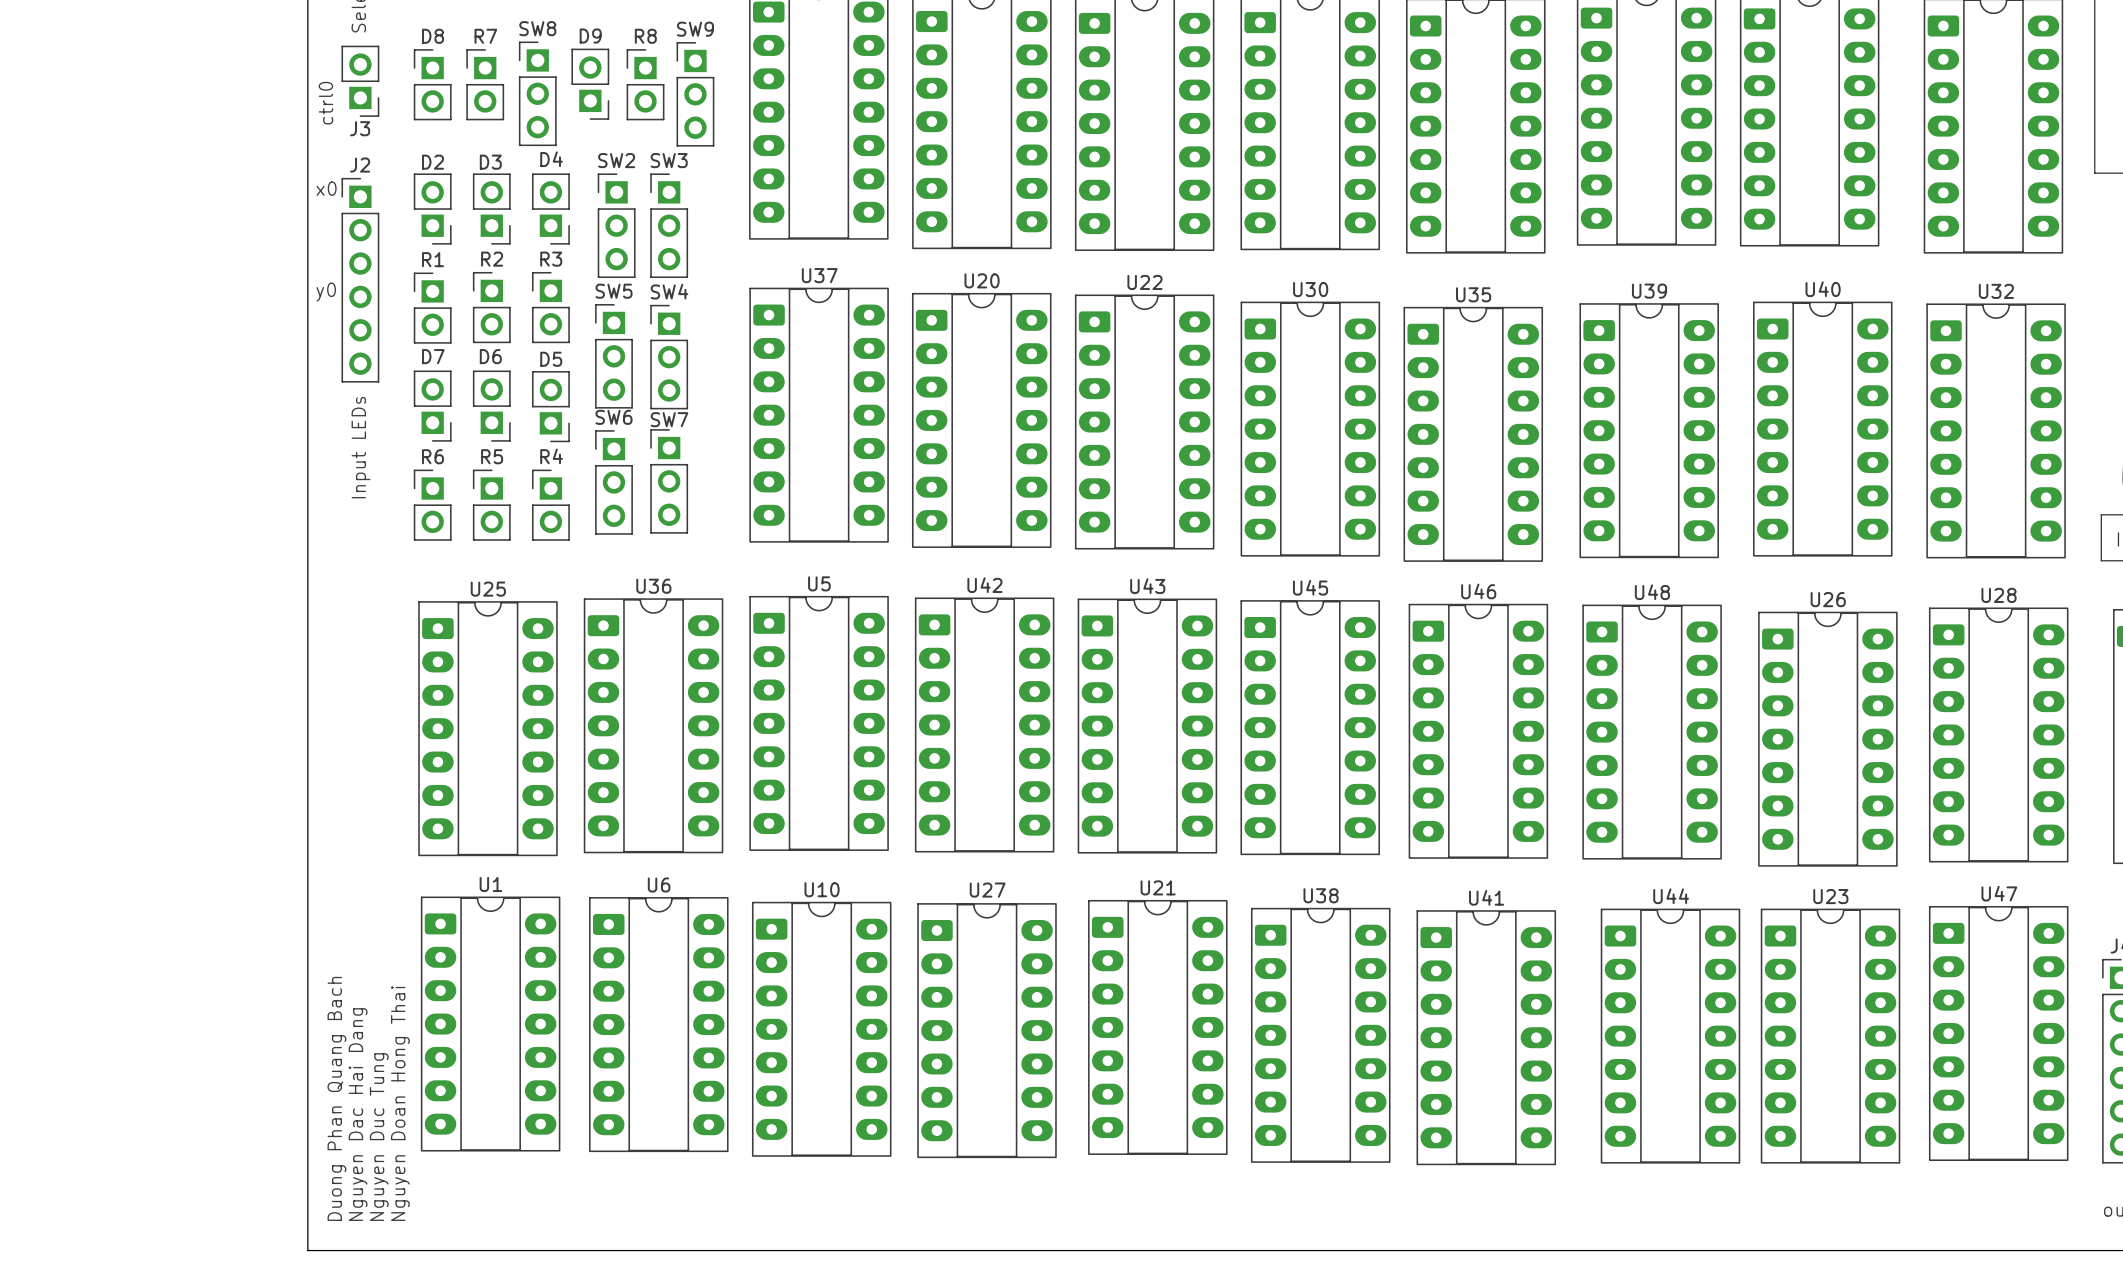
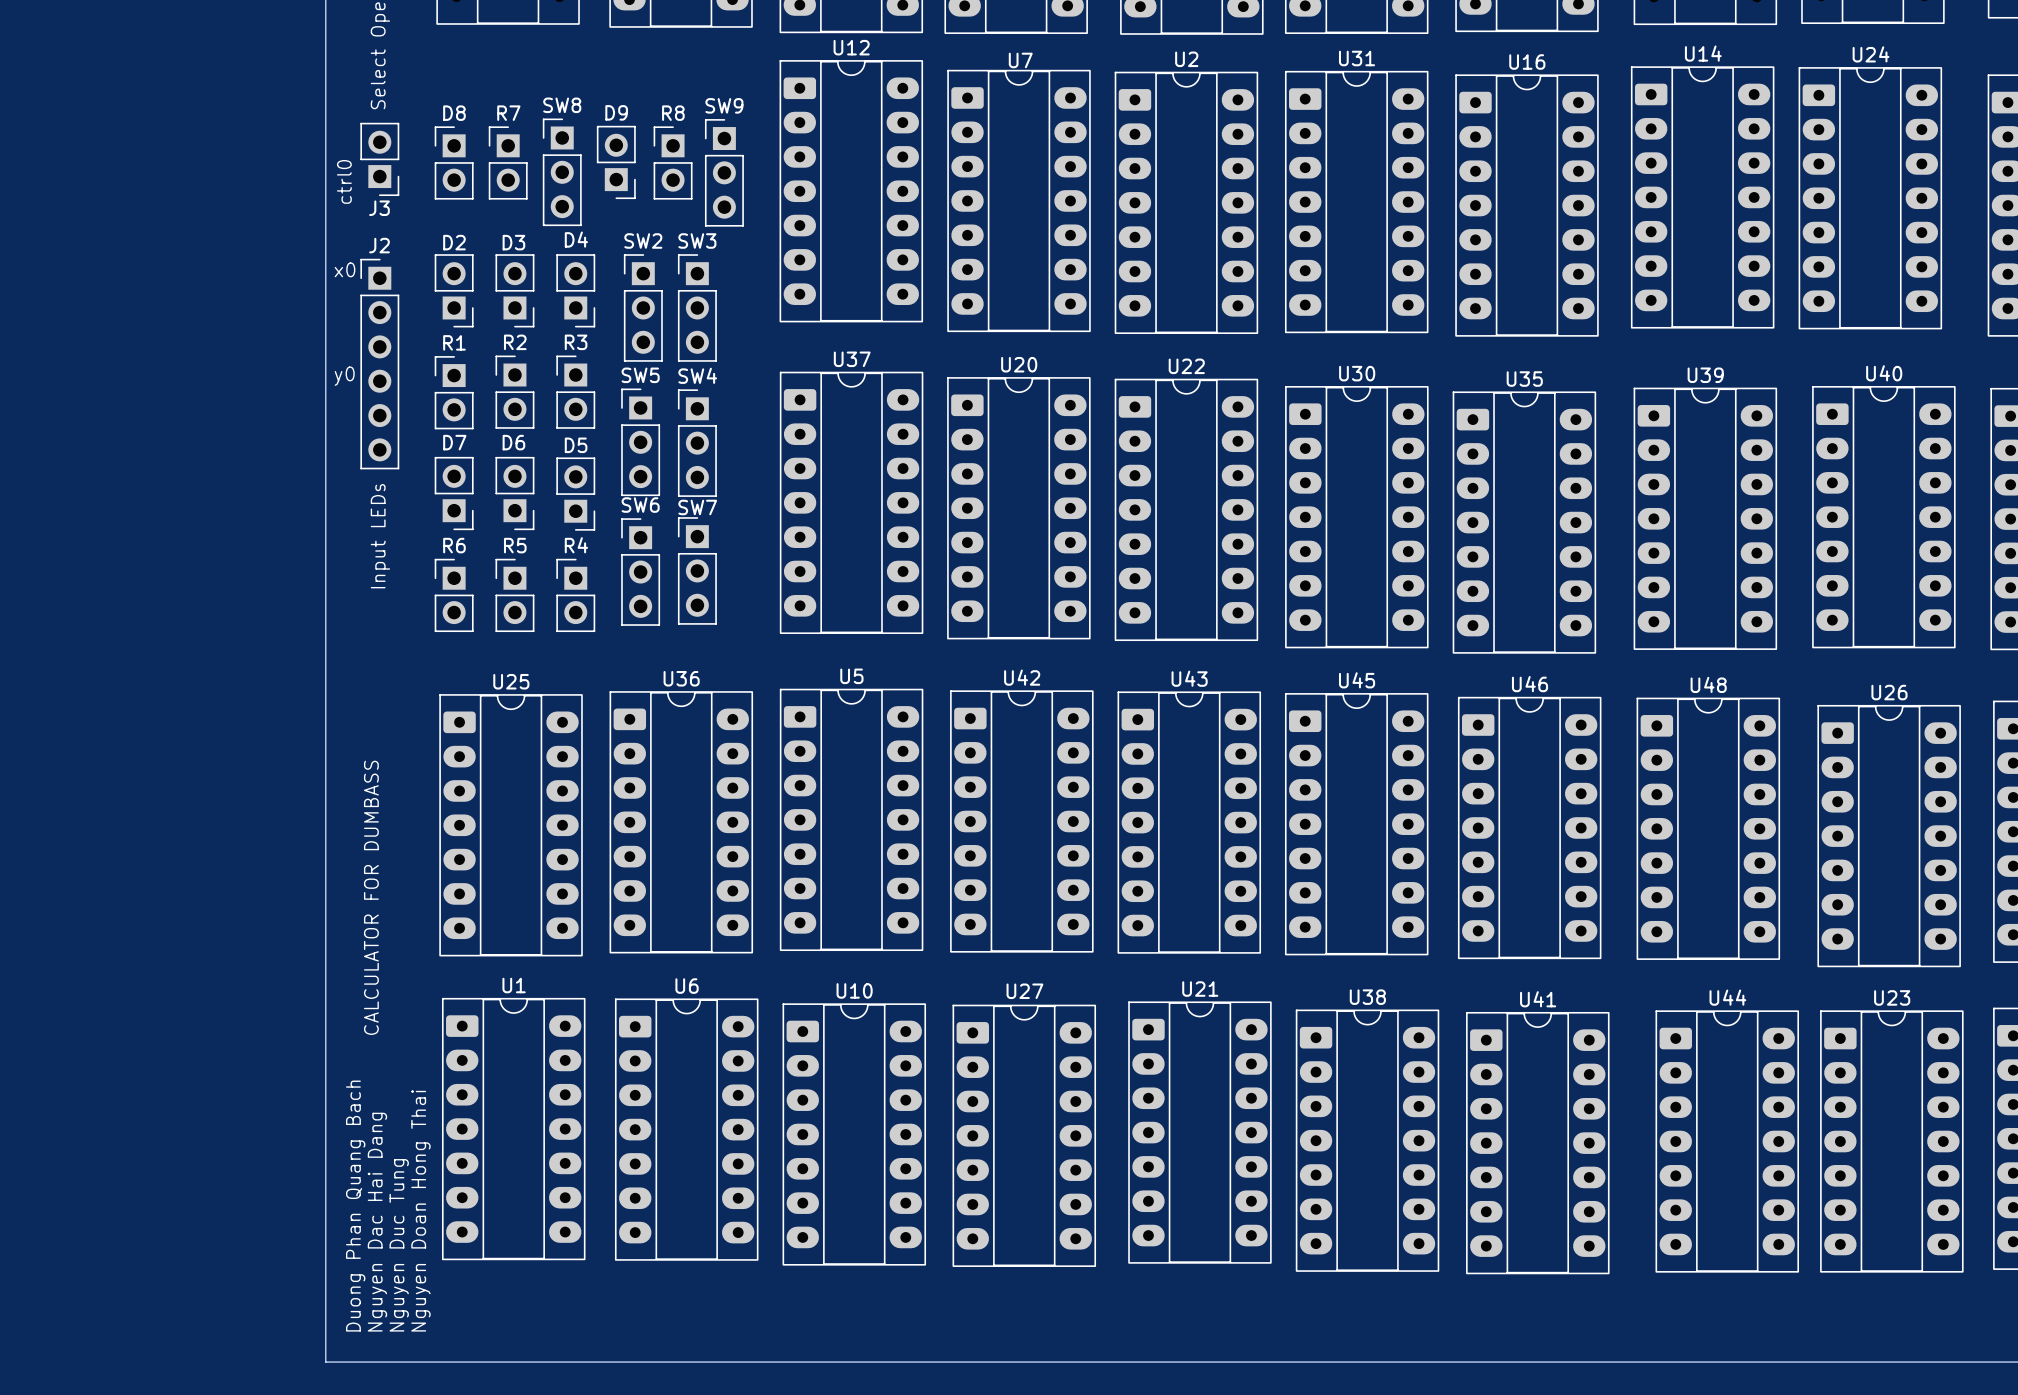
text: none -> CALCULATOR FOR DUMBASS (371, 897)

